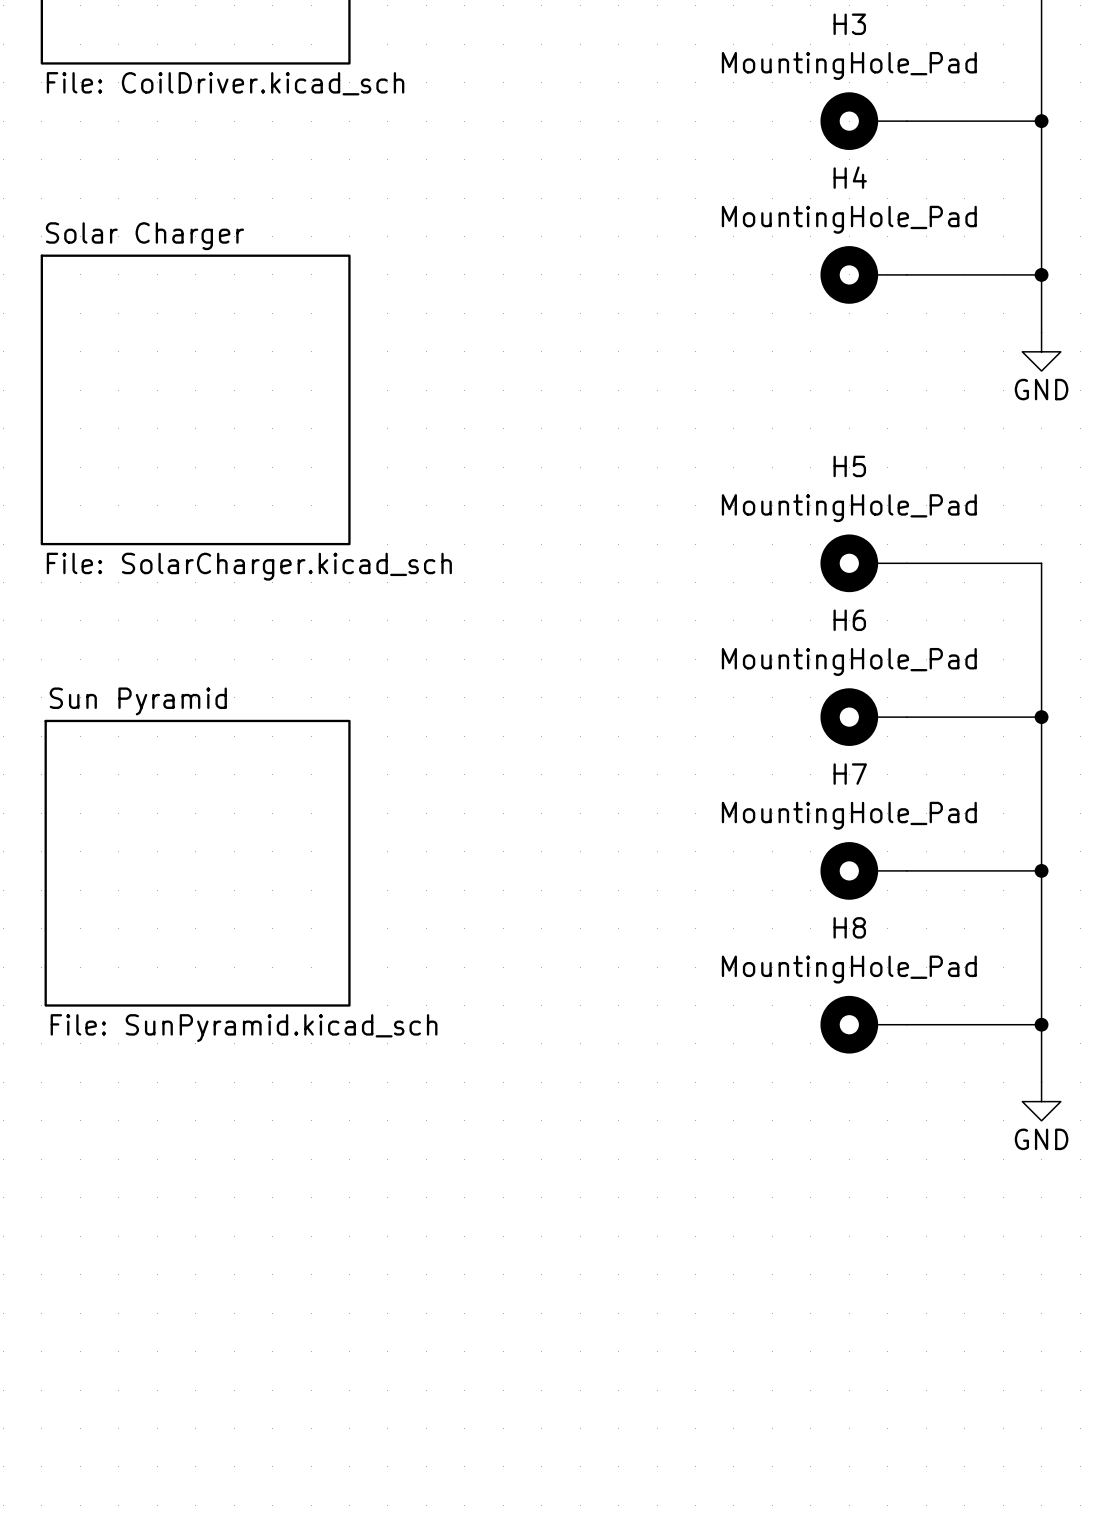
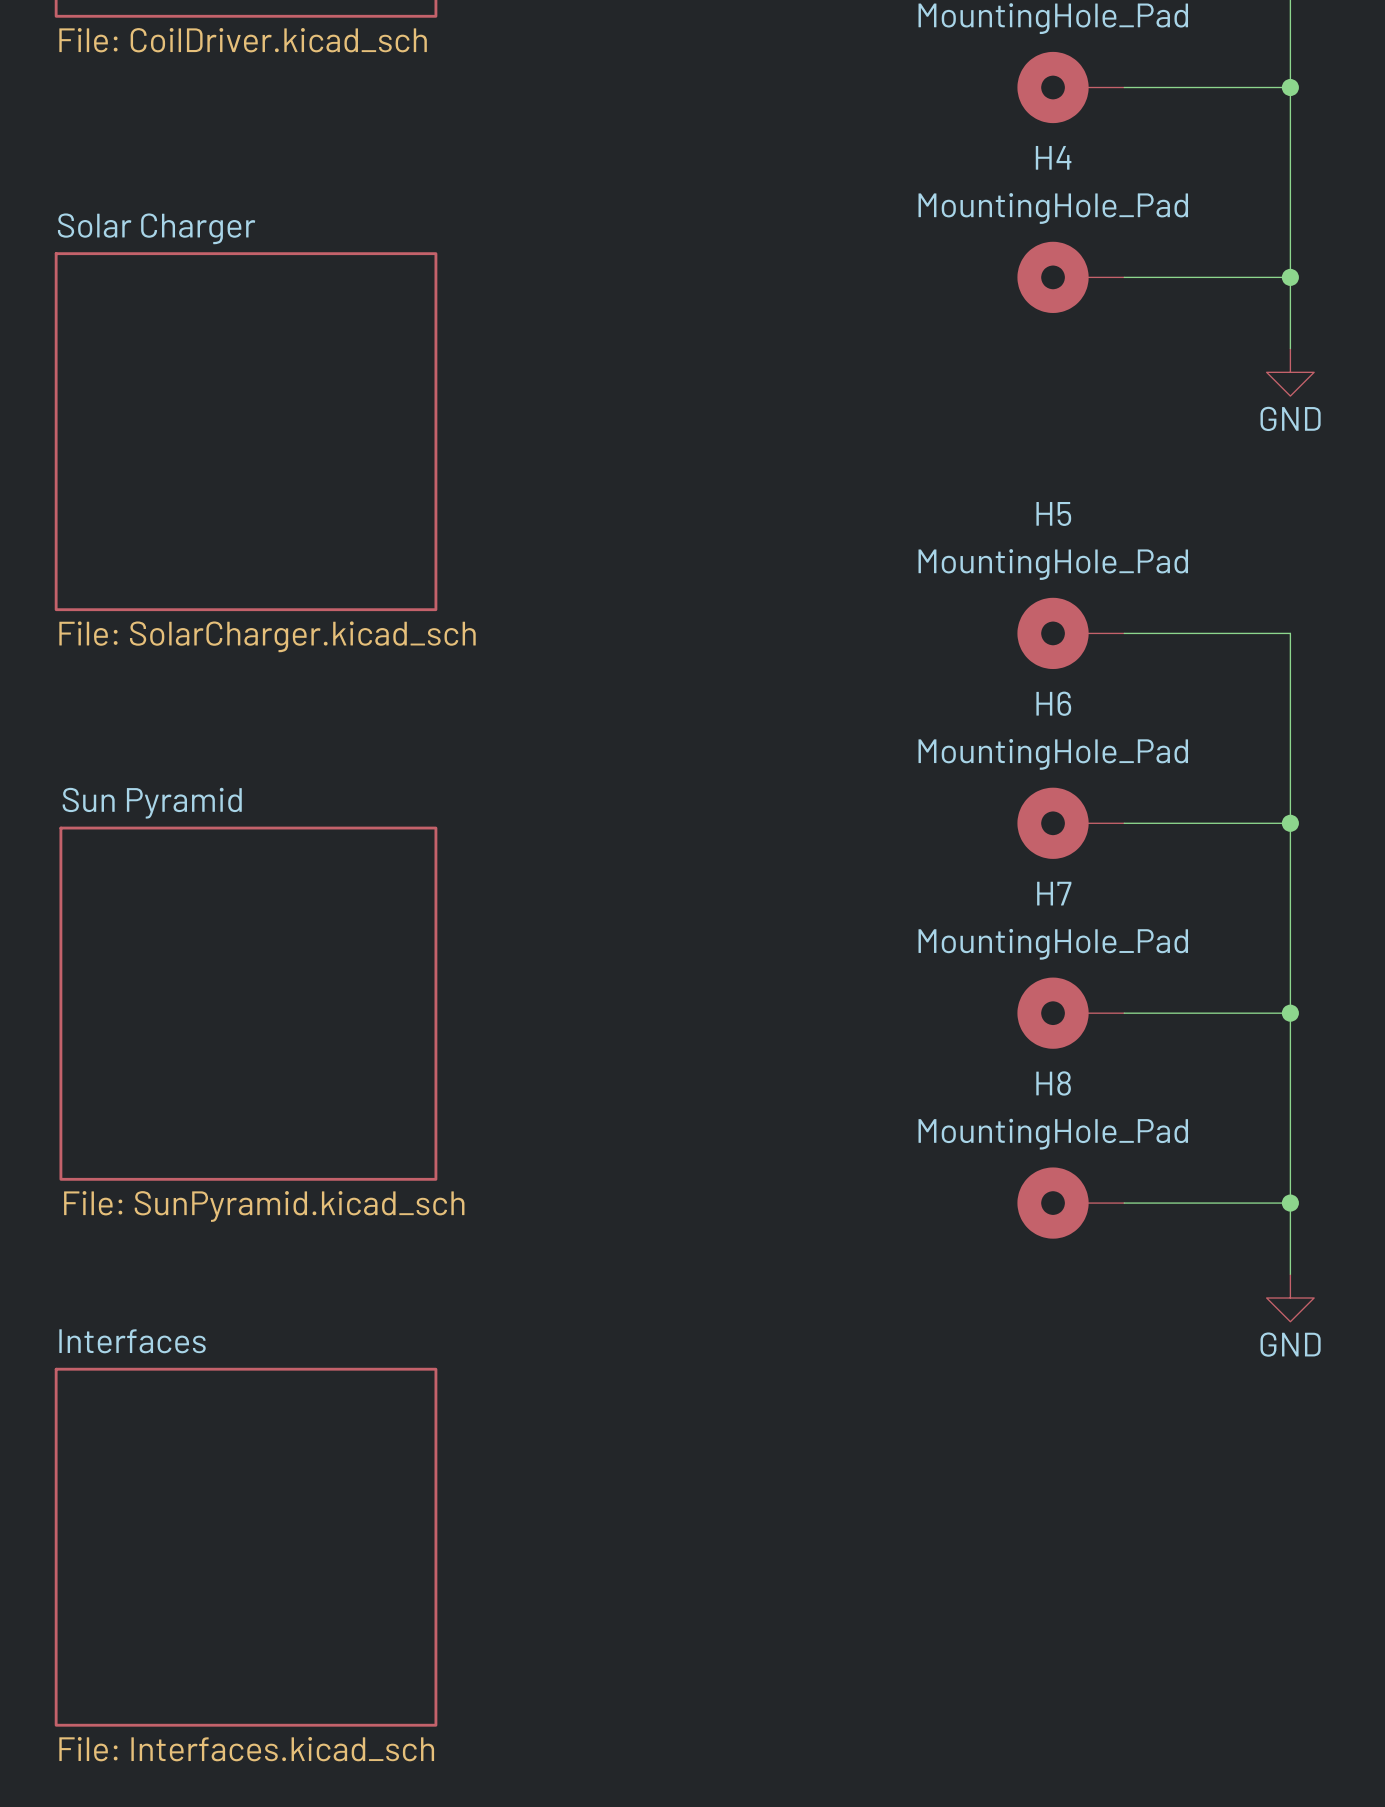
sheet Interfaces: none -> File: Interfaces.kicad_sch (246, 1547)

